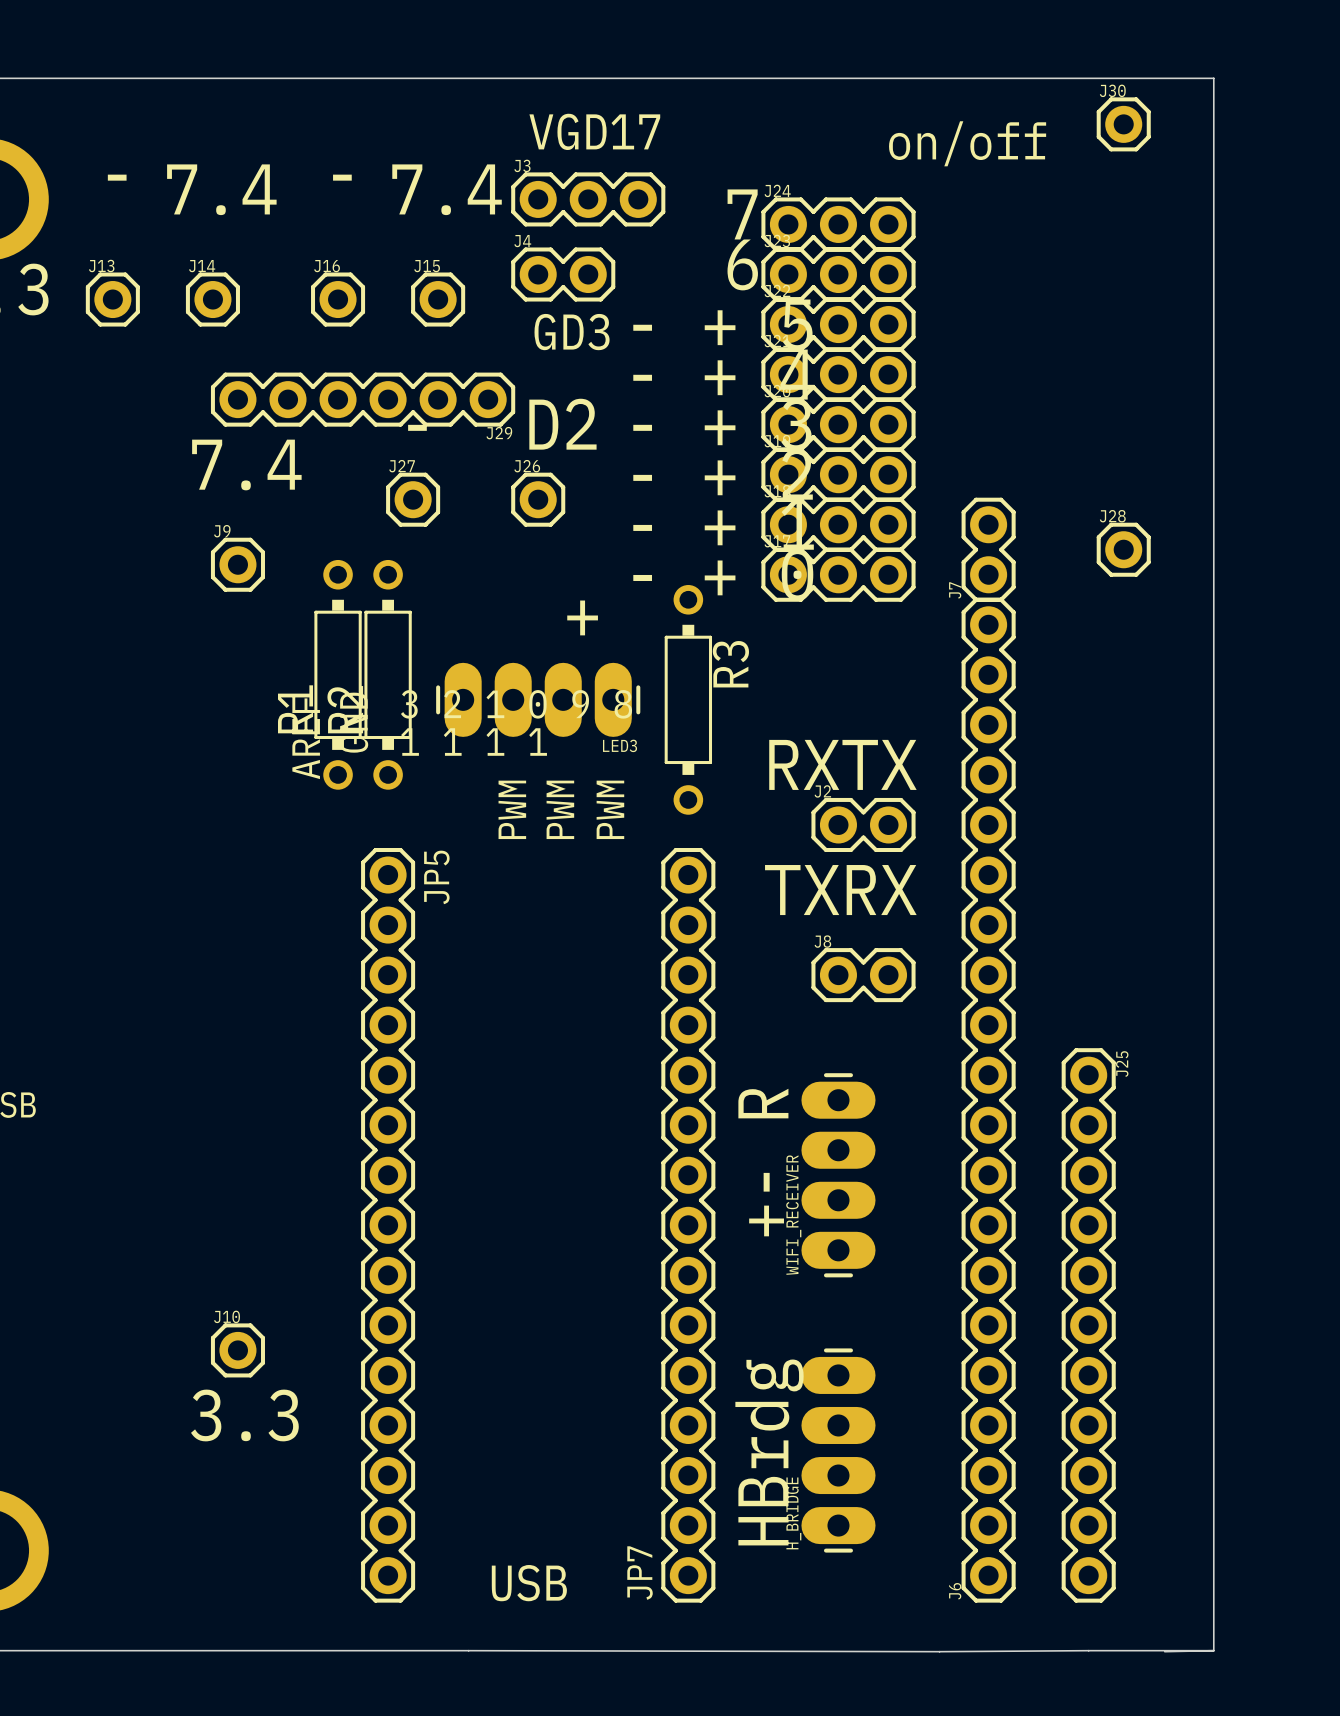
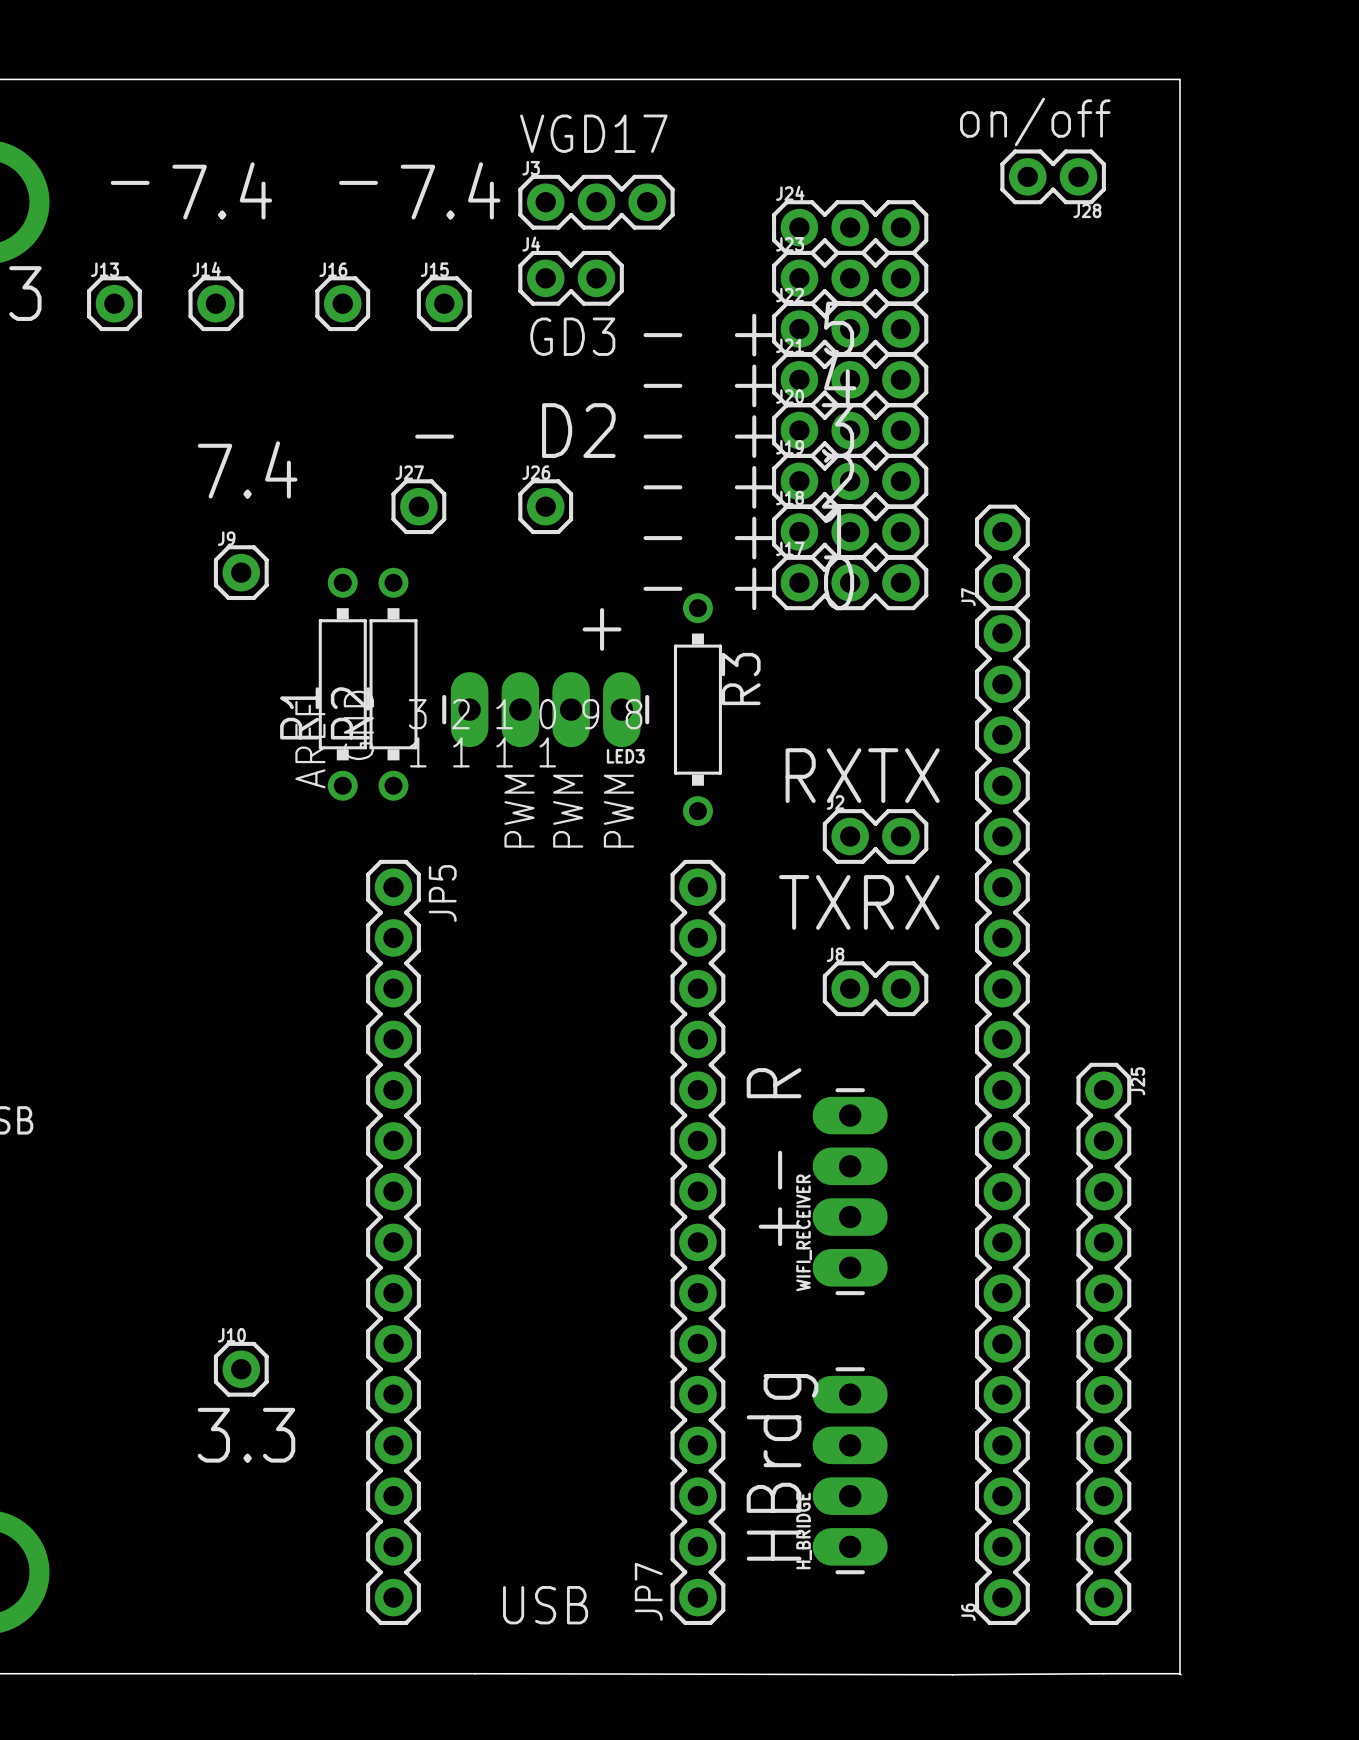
board edge: (1163, 78) (1213, 78) (1213, 1650) -> (1179, 79) (1181, 1674)
J30: (1123, 124) -> none
text position: on/off (967, 143) -> on/off (1035, 121)
text: 7 (742, 214) -> none
text: 6 (742, 264) -> none
J29: (363, 399) -> none
J28 name position: J28 (1112, 516) -> J28 (1087, 210)
J28 footprint: [1096, 522, 1151, 577] -> [1000, 149, 1106, 205]
board edge: (1163, 1650) (1213, 1650) -> none
board edge: (1213, 1650) (1164, 1651) -> none

